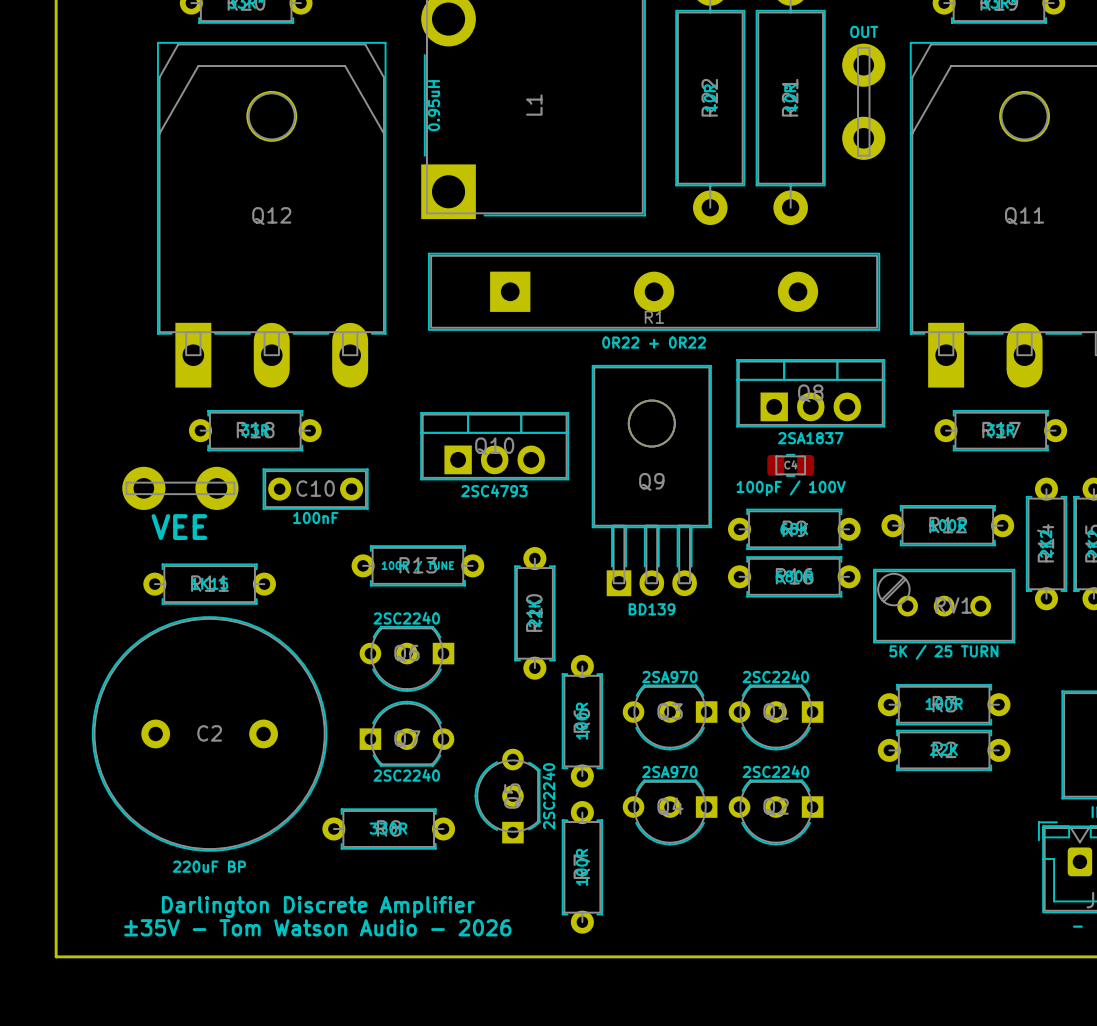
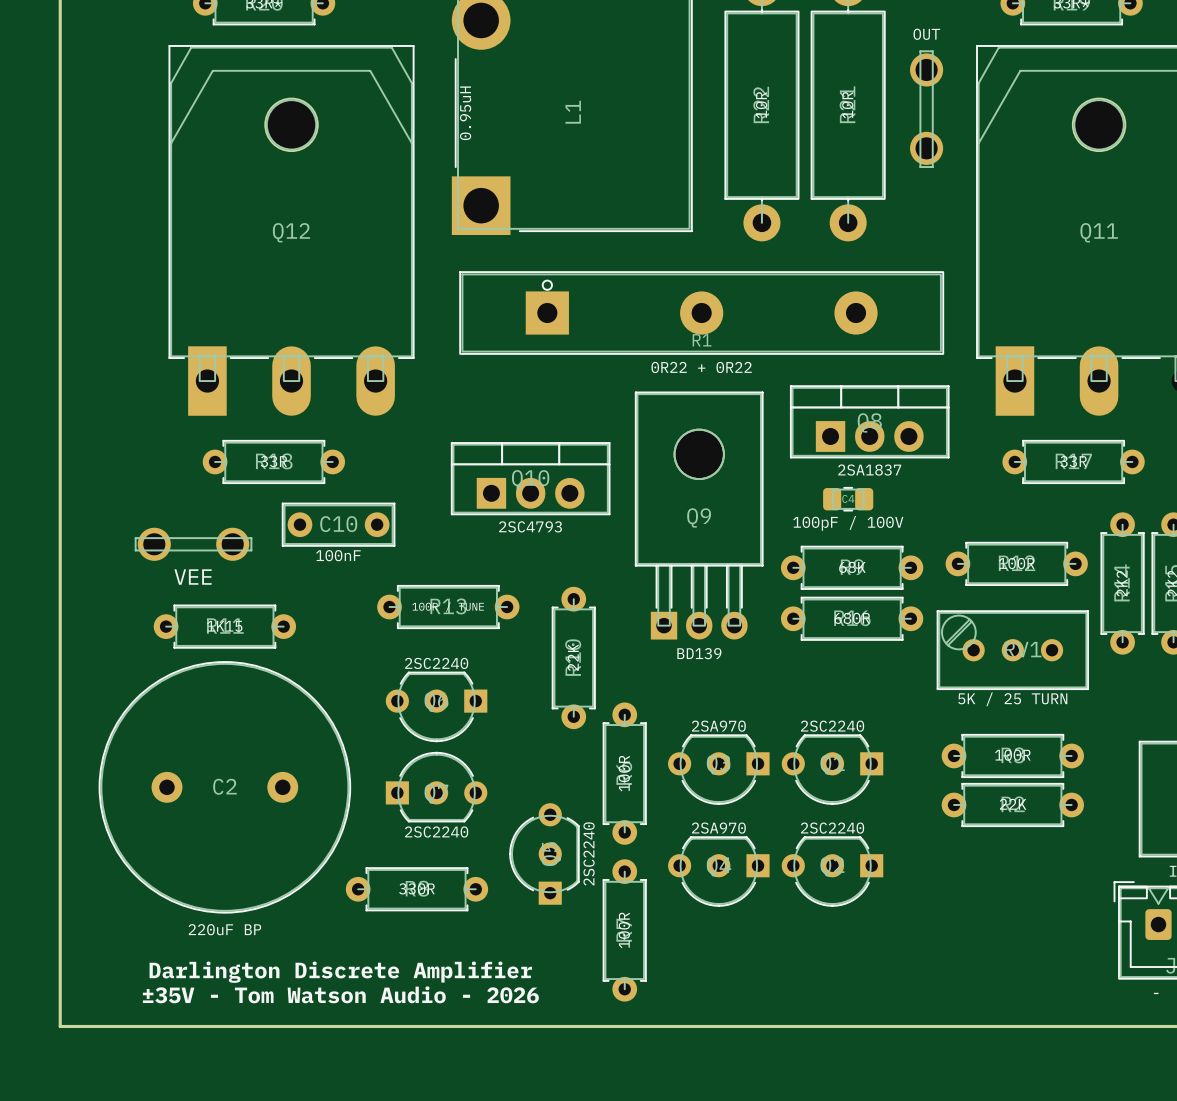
part footprint: [842, 43, 886, 160] -> [910, 50, 944, 169]
R1 footprint: [428, 252, 881, 331] -> [459, 271, 945, 355]
part: VEE (180, 488) -> none
part: none -> VEE (193, 544)

